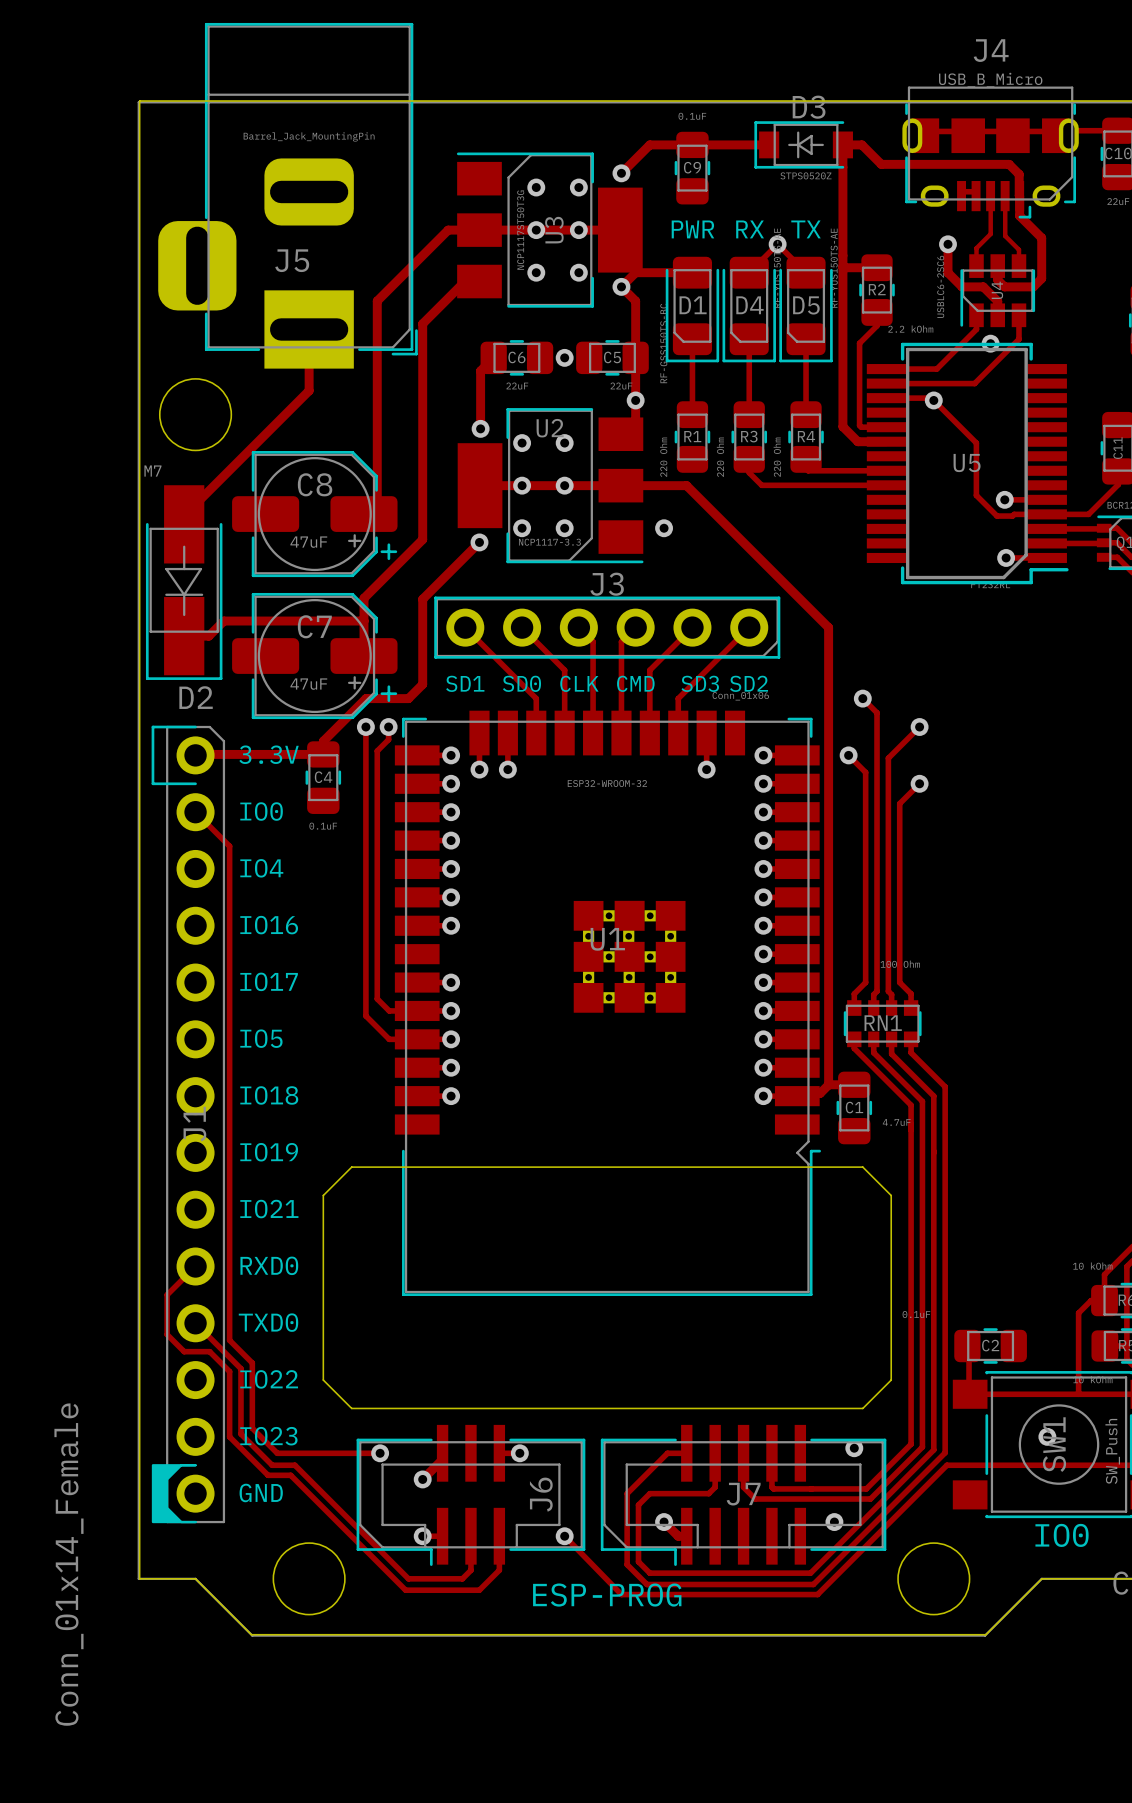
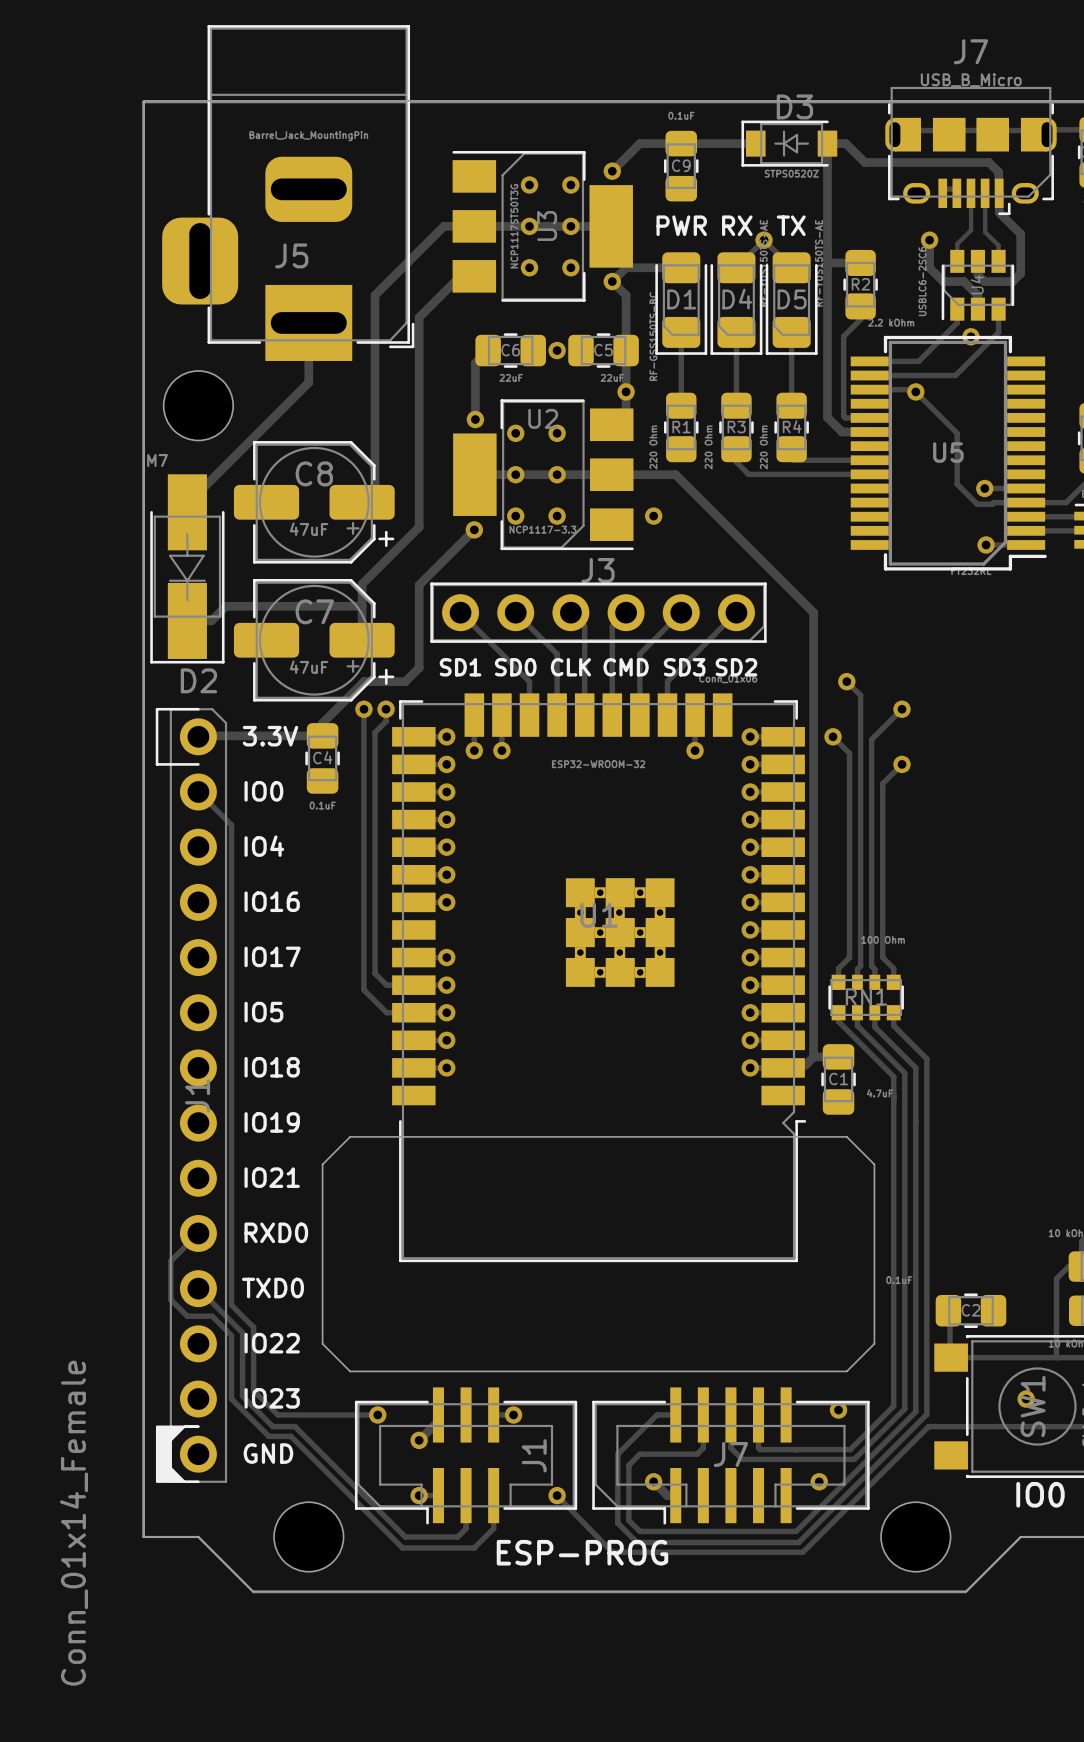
J4 name: J4 (991, 50) -> J7 (970, 51)
J6 name: J6 (541, 1494) -> J1 (534, 1455)

